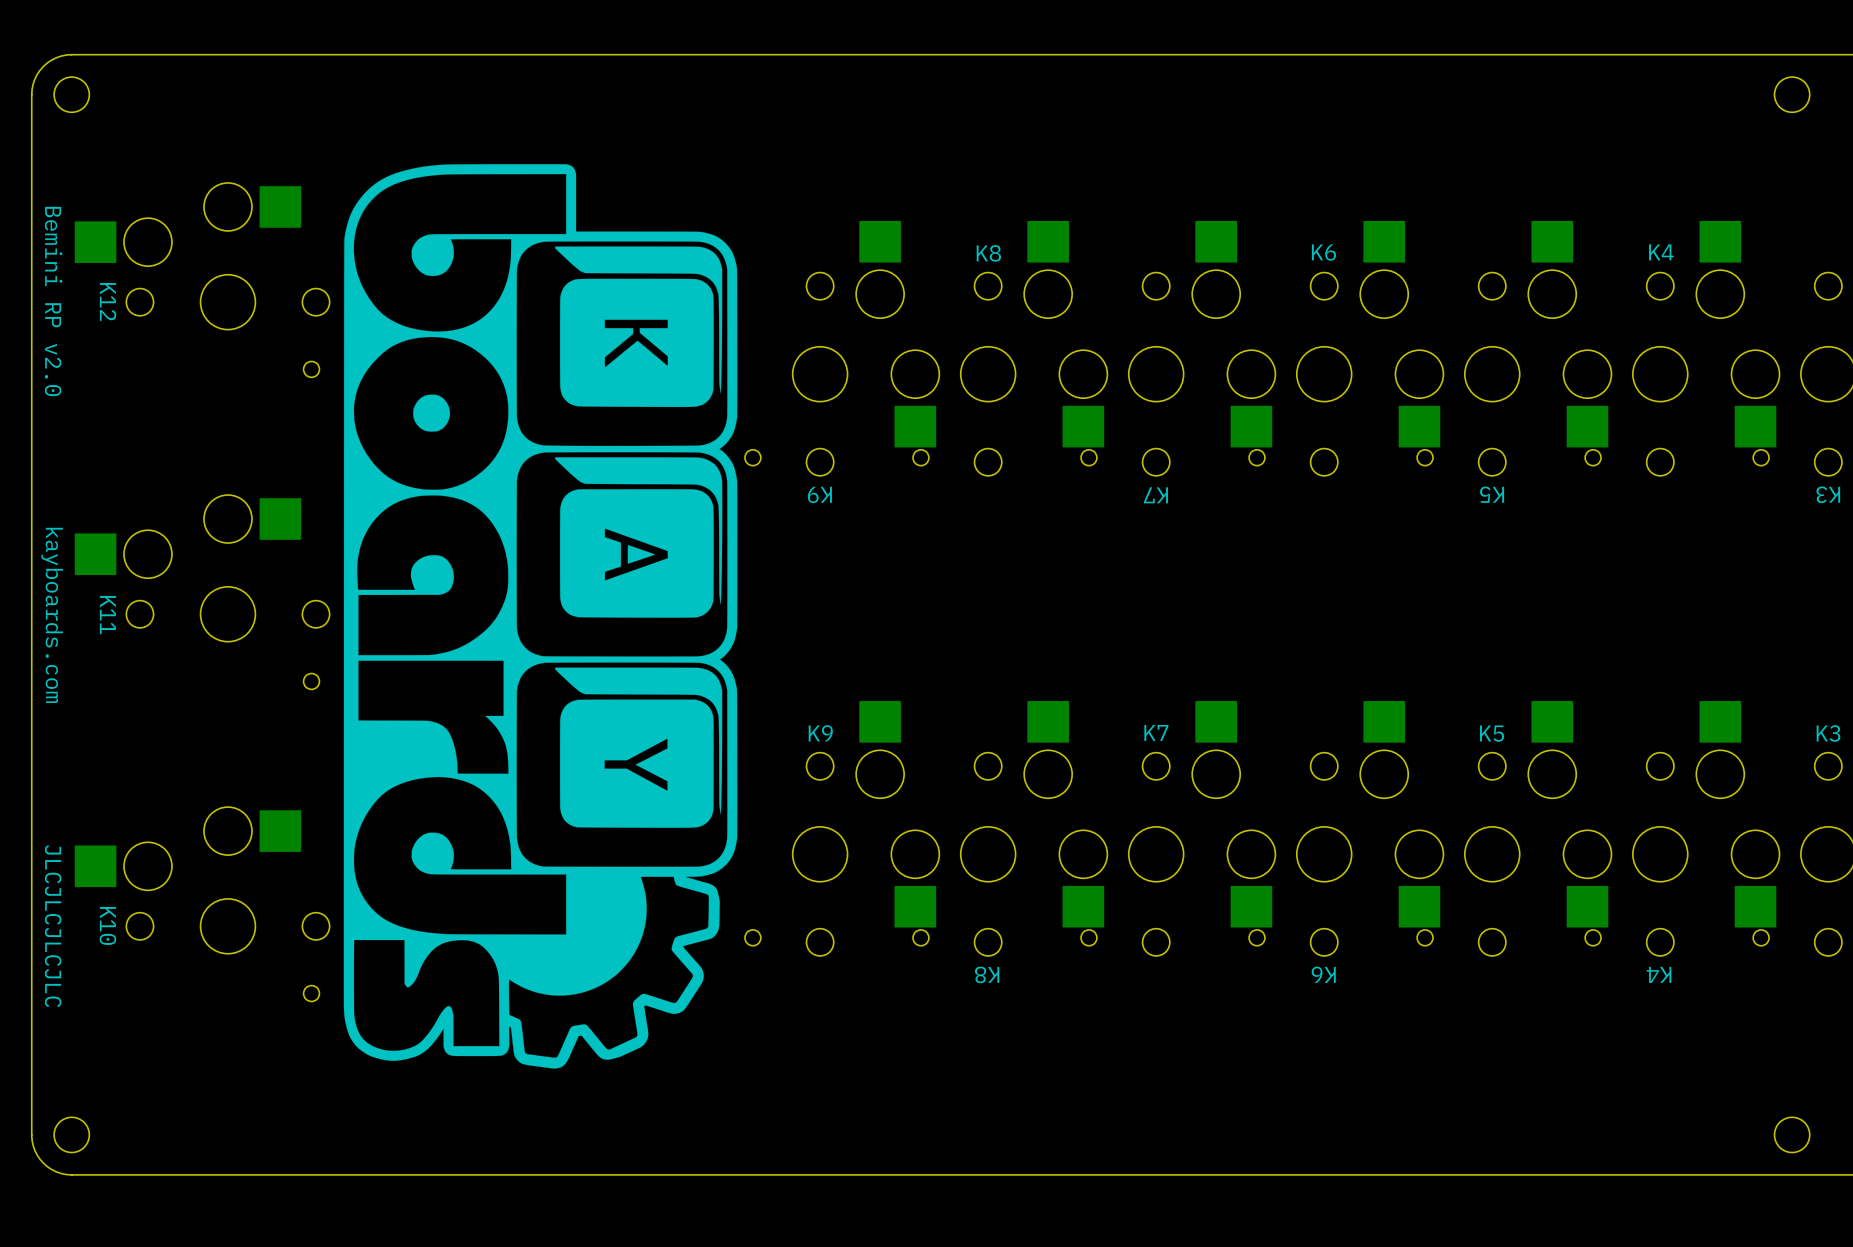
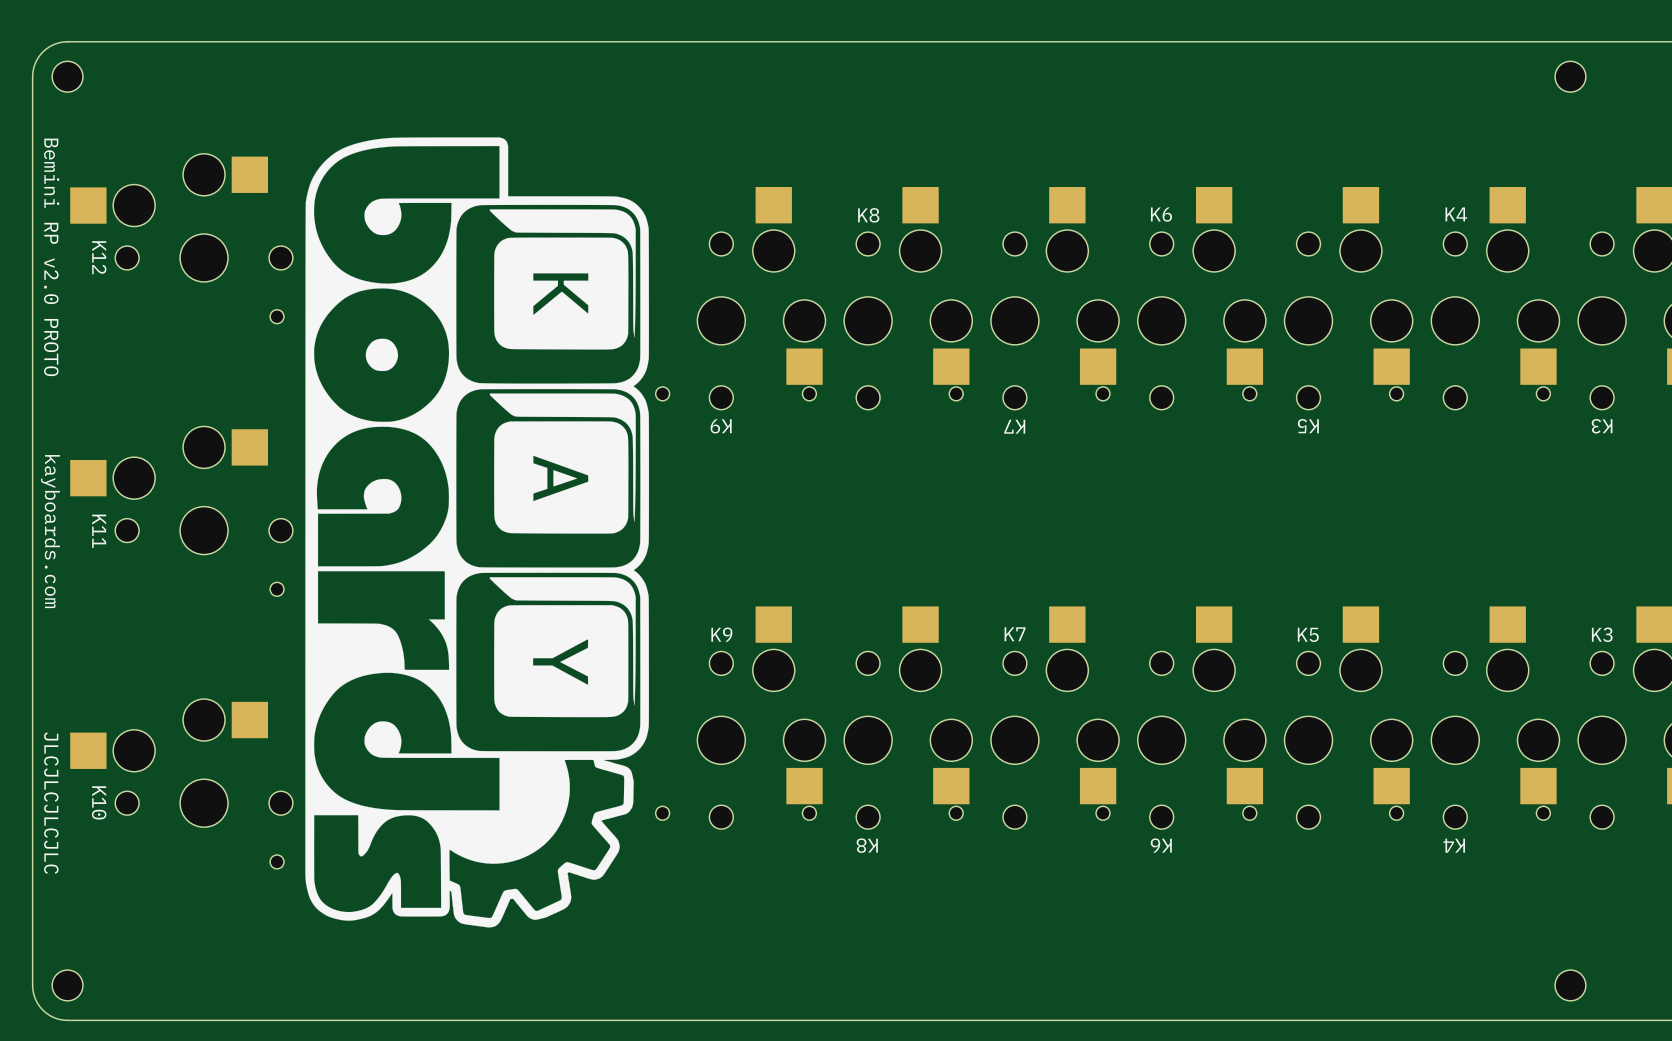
text: Bemini RP v2.0 (53, 301) -> Bemini RP v2.0 PROTO (51, 257)

